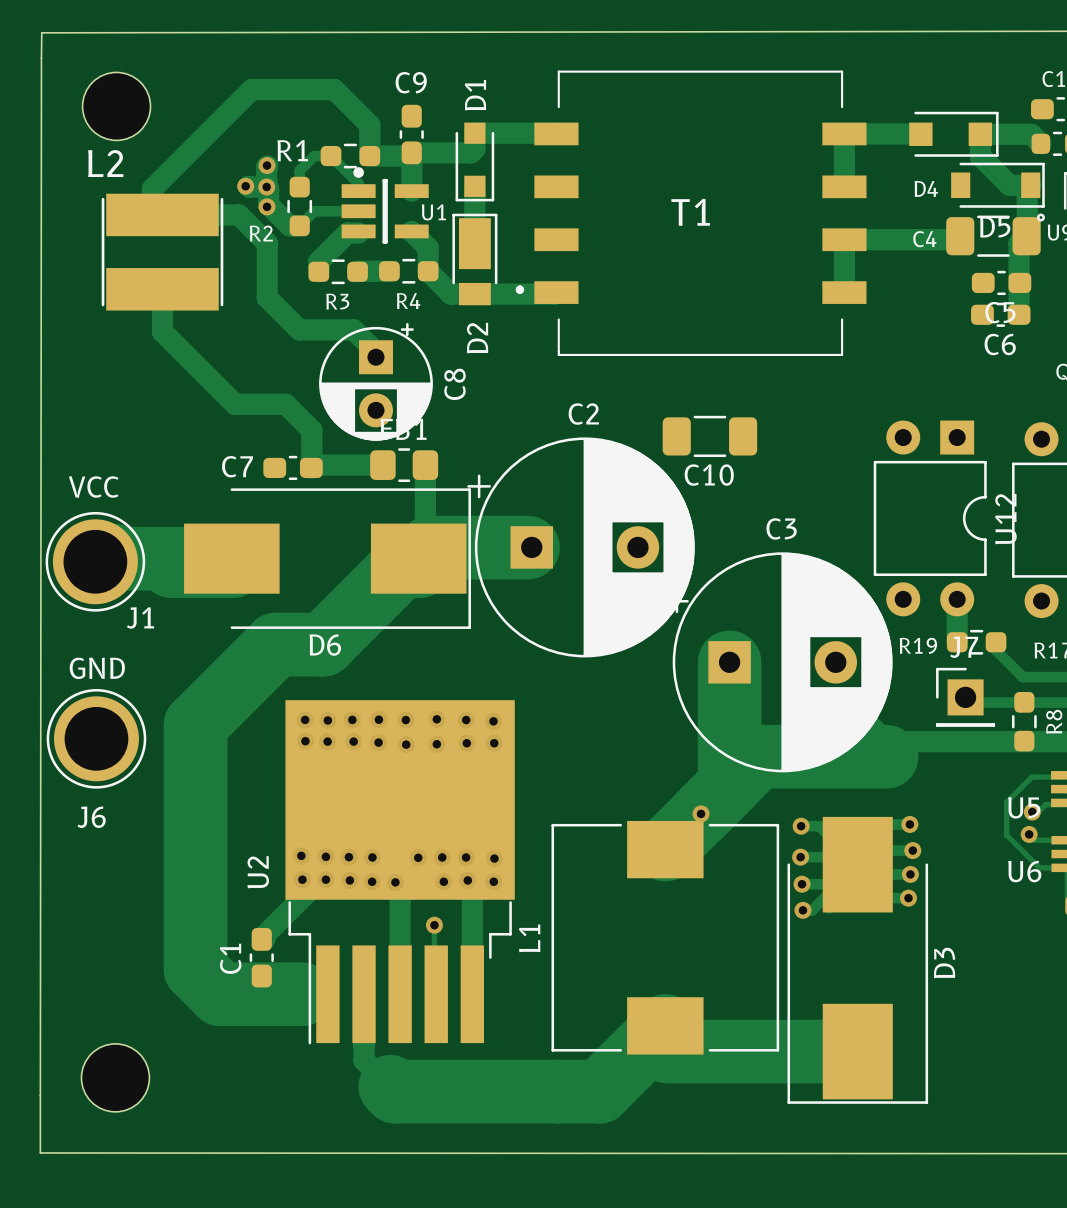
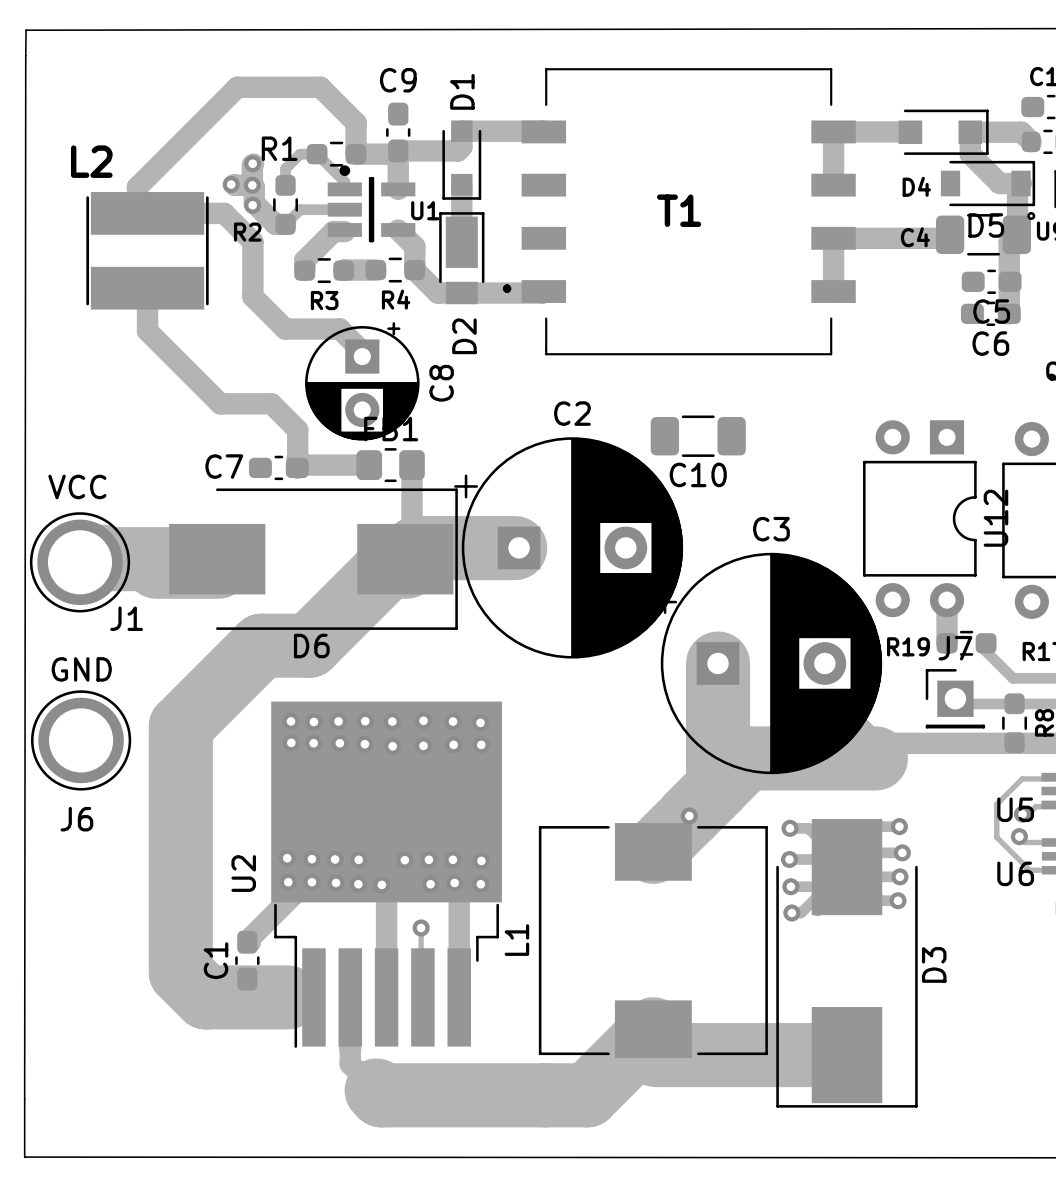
part: (116, 106) -> none
part: (115, 1077) -> none

